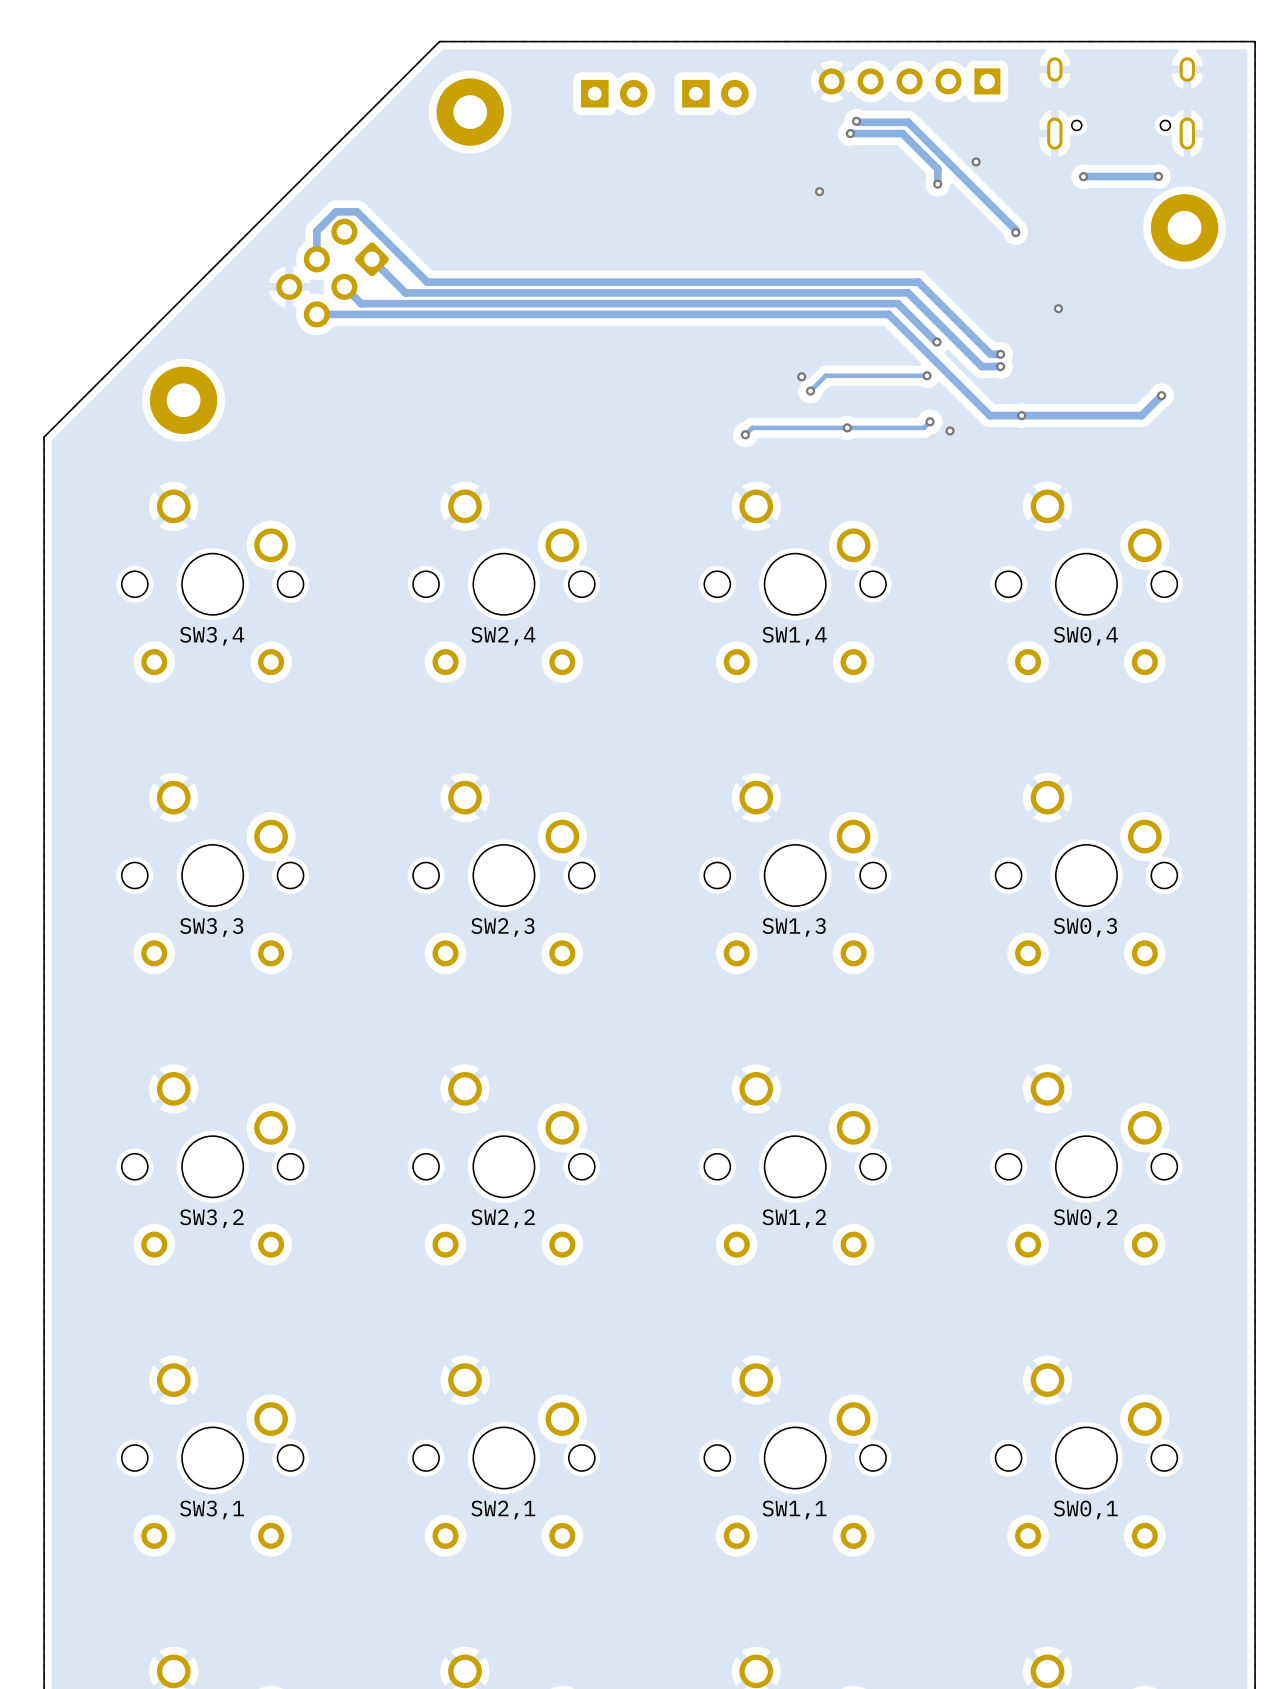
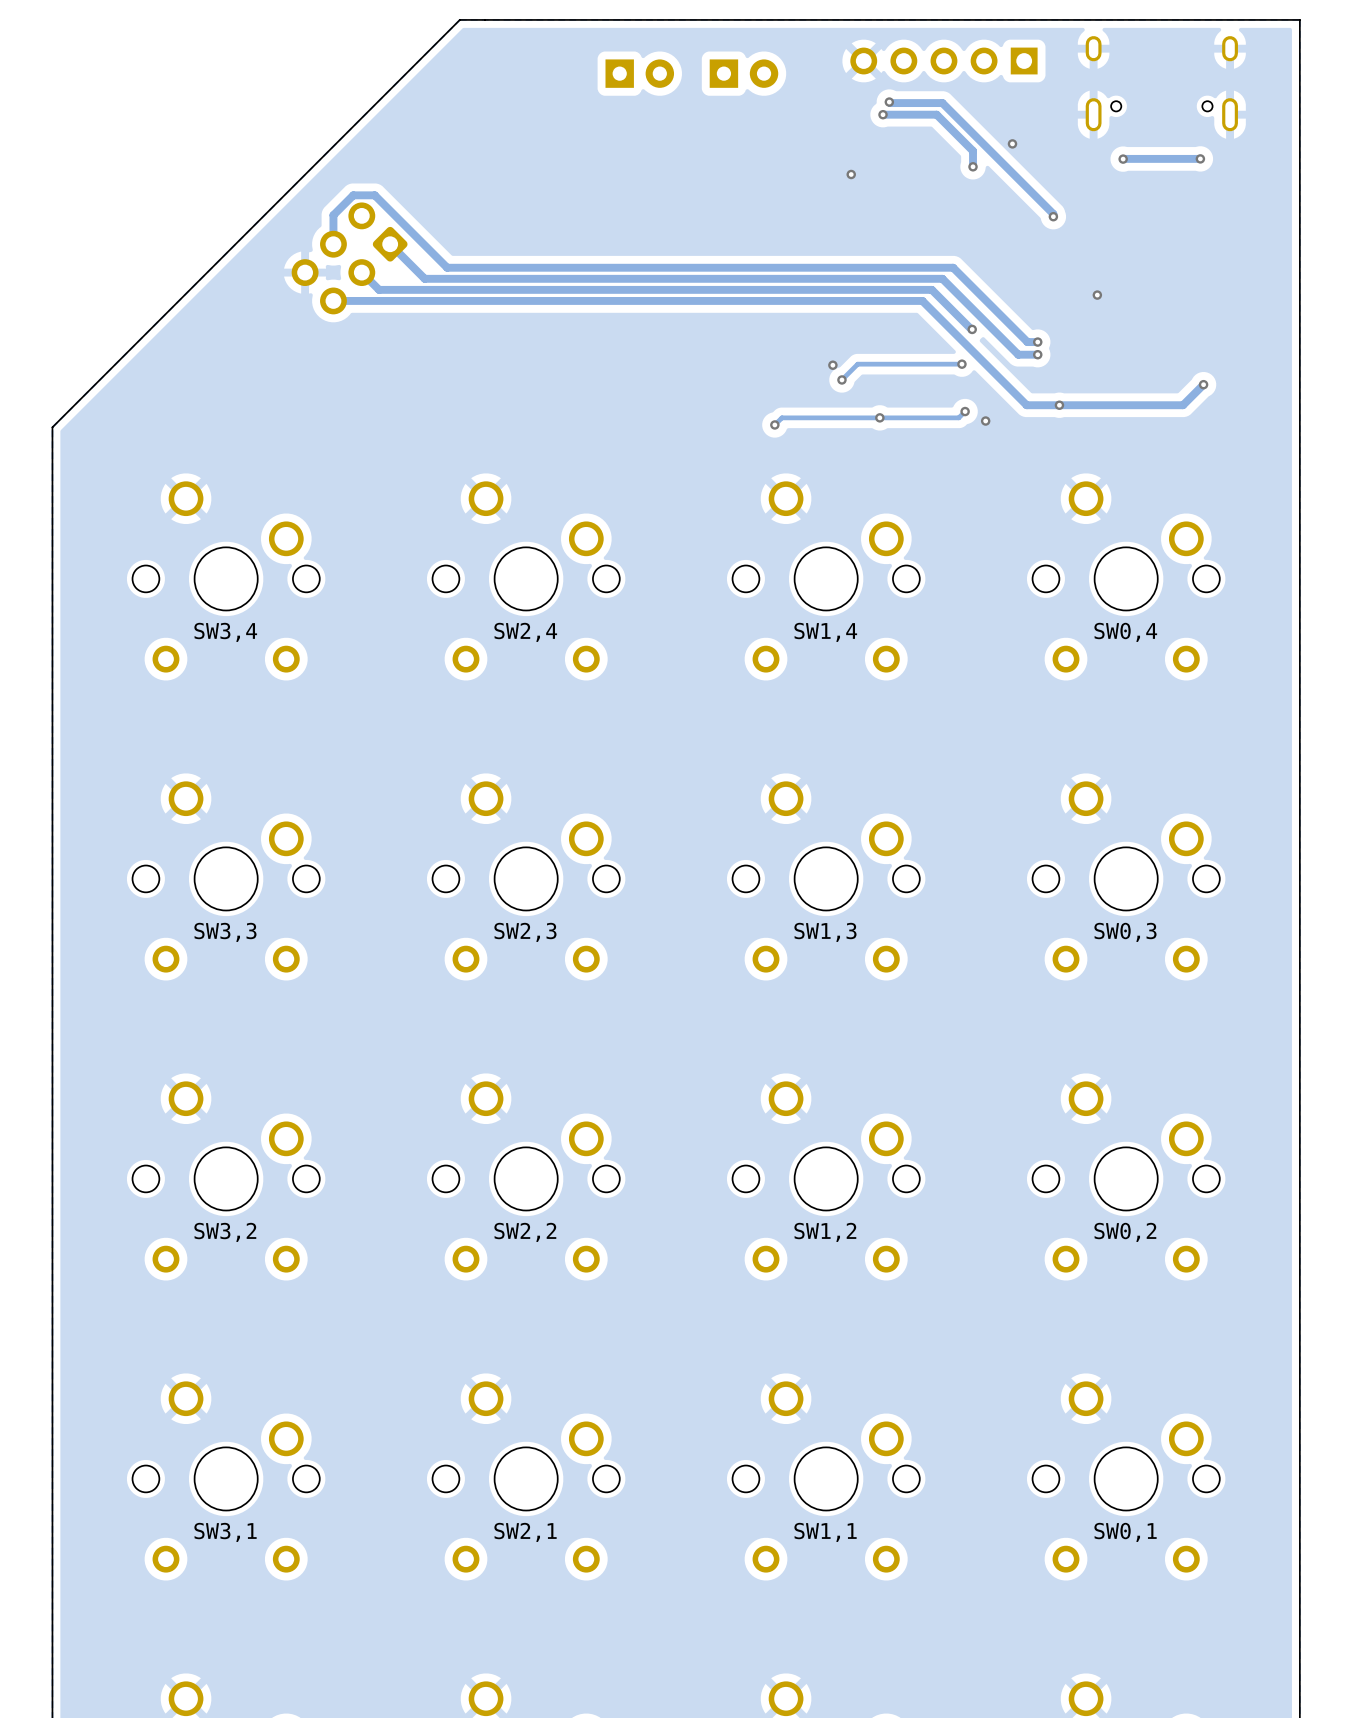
part: (470, 112) -> none
part: (1184, 227) -> none
part: (183, 400) -> none

